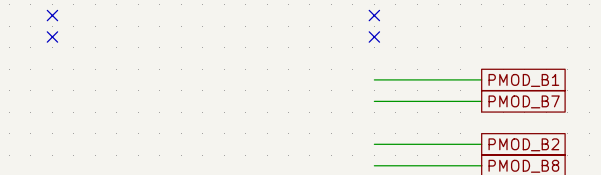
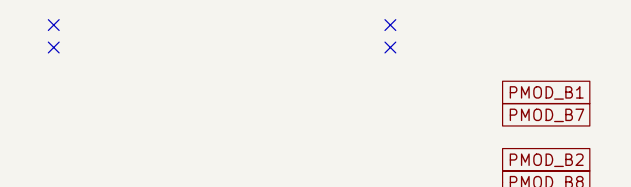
wire: (374, 79) (481, 79) -> none
wire: (374, 101) (481, 101) -> none
wire: (374, 144) (481, 144) -> none
wire: (374, 165) (481, 165) -> none

